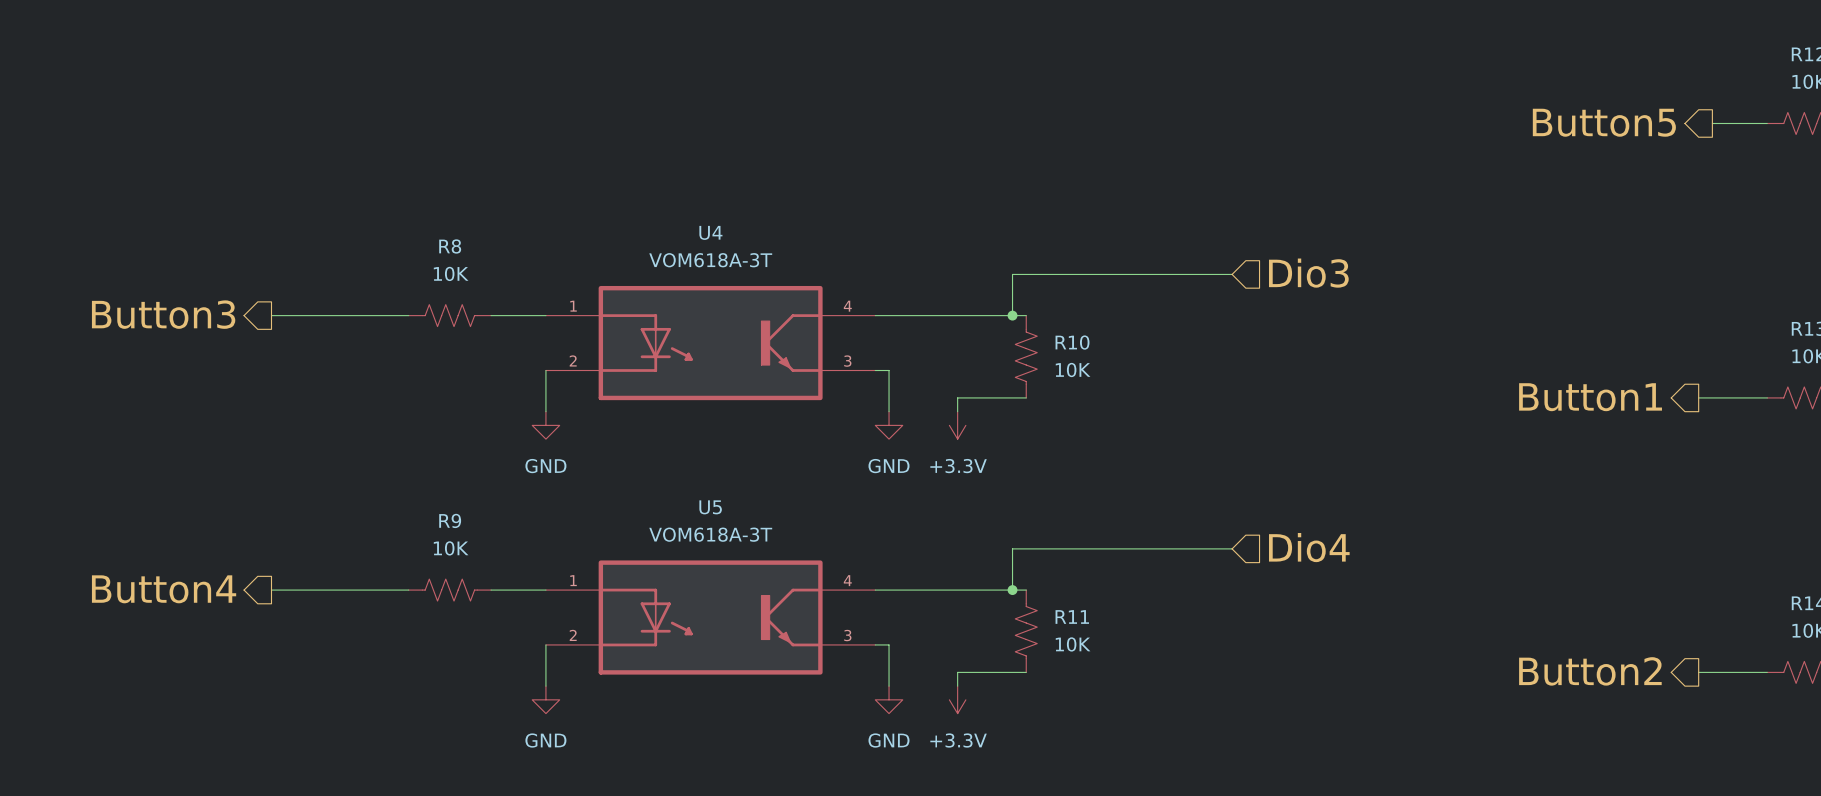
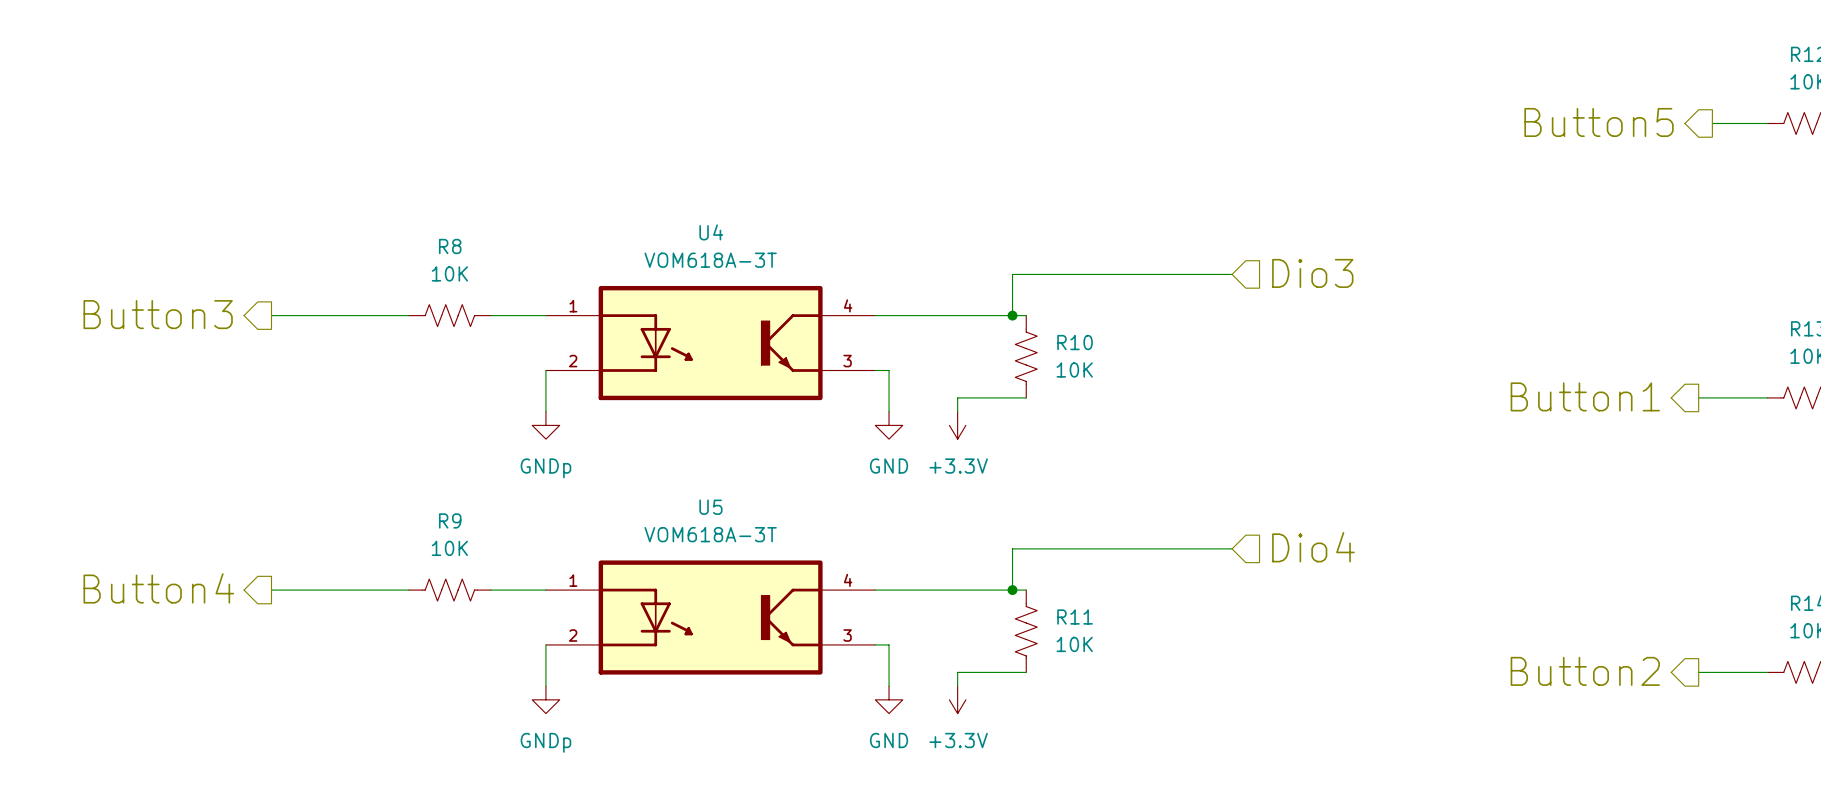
power symbol: GND (545, 425) -> GNDp (545, 425)
power symbol: GND (545, 699) -> GNDp (545, 699)

